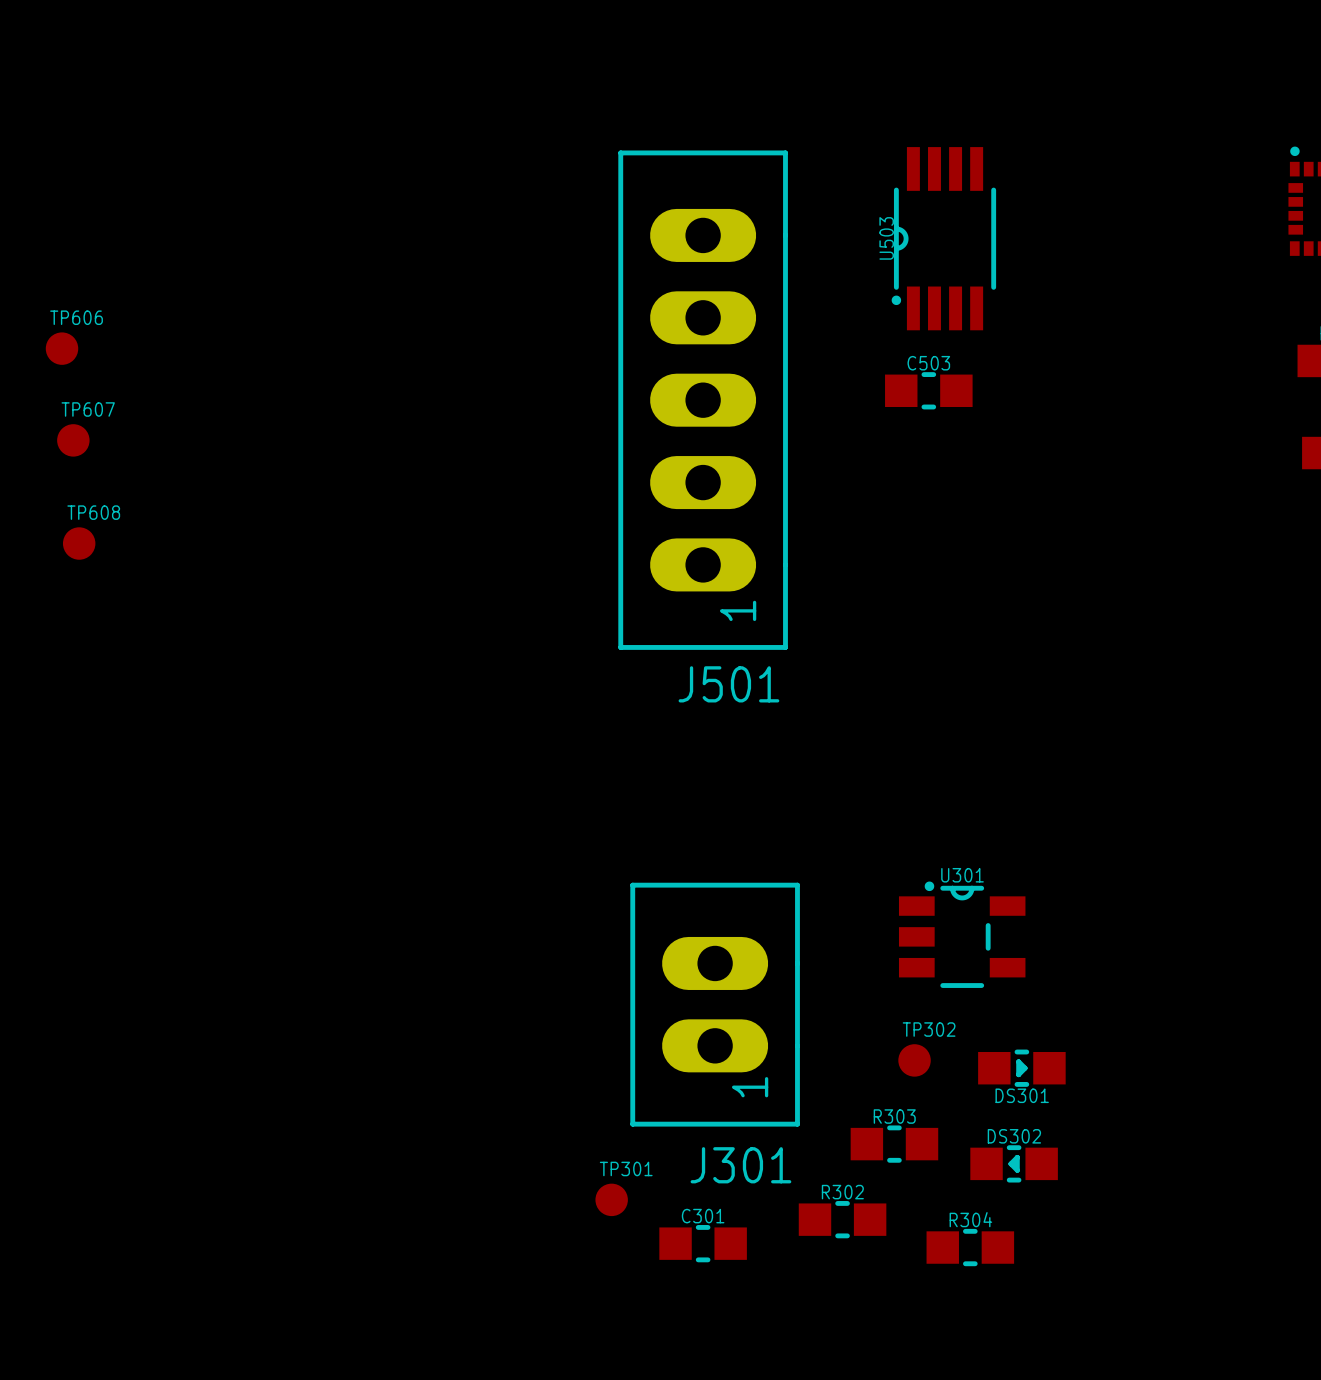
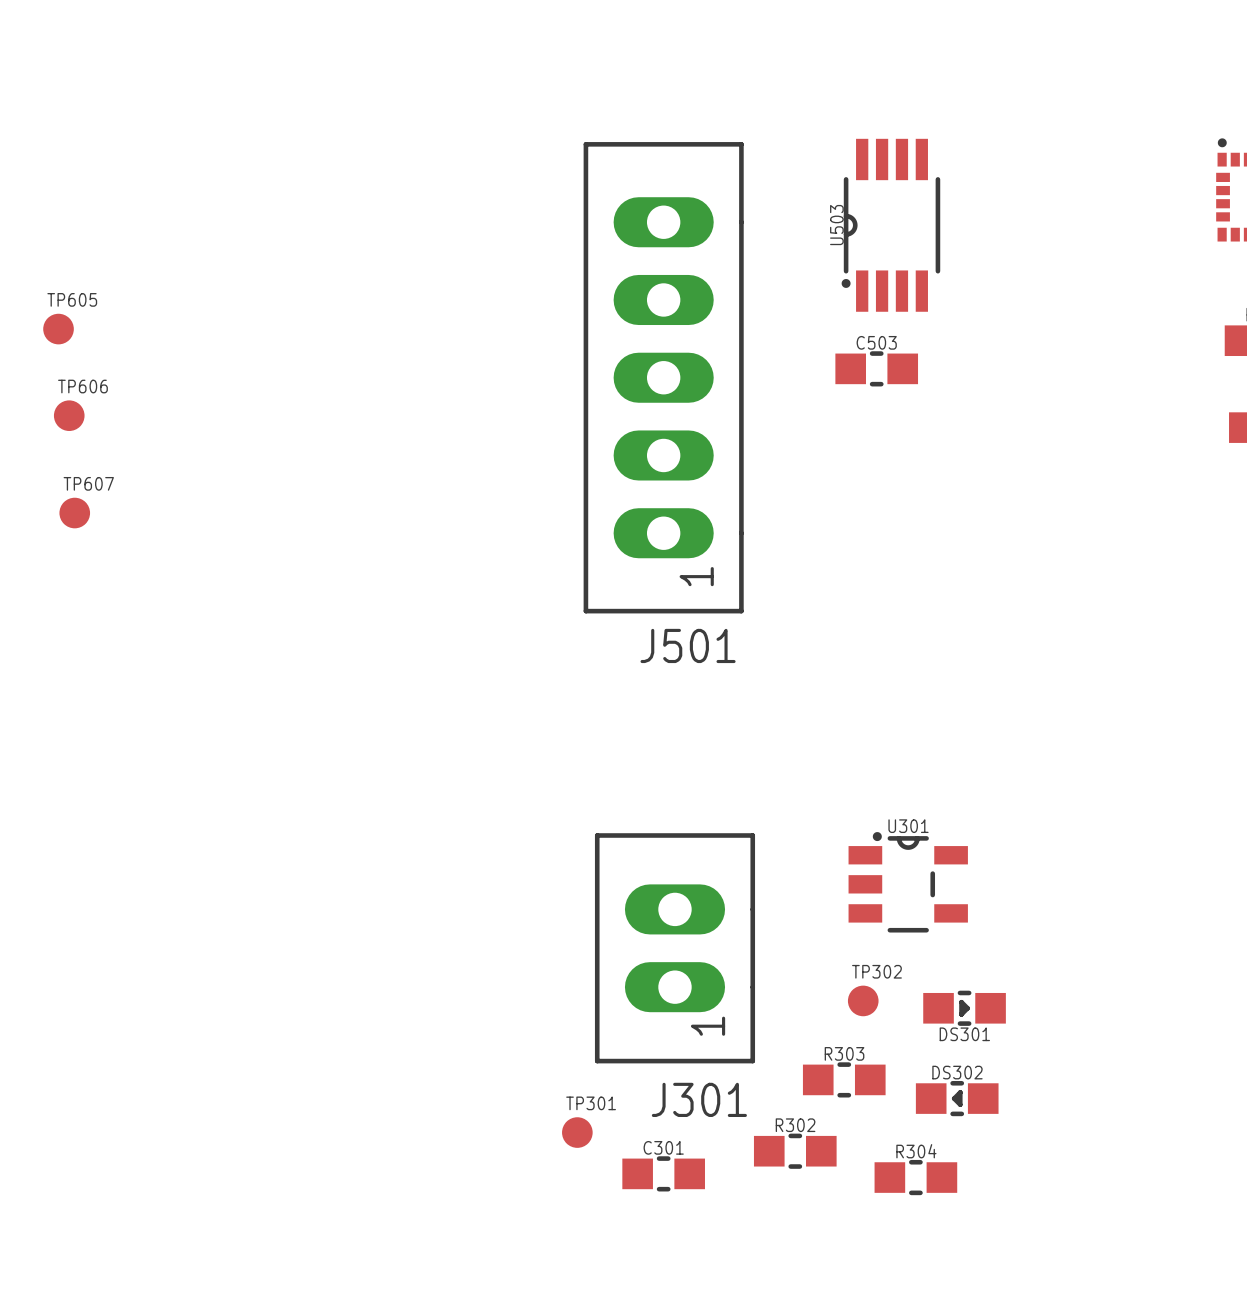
TP606 name: TP606 (76, 317) -> TP605 (72, 299)
TP607 name: TP607 (88, 409) -> TP606 (82, 386)
TP608 name: TP608 (93, 512) -> TP607 (88, 483)

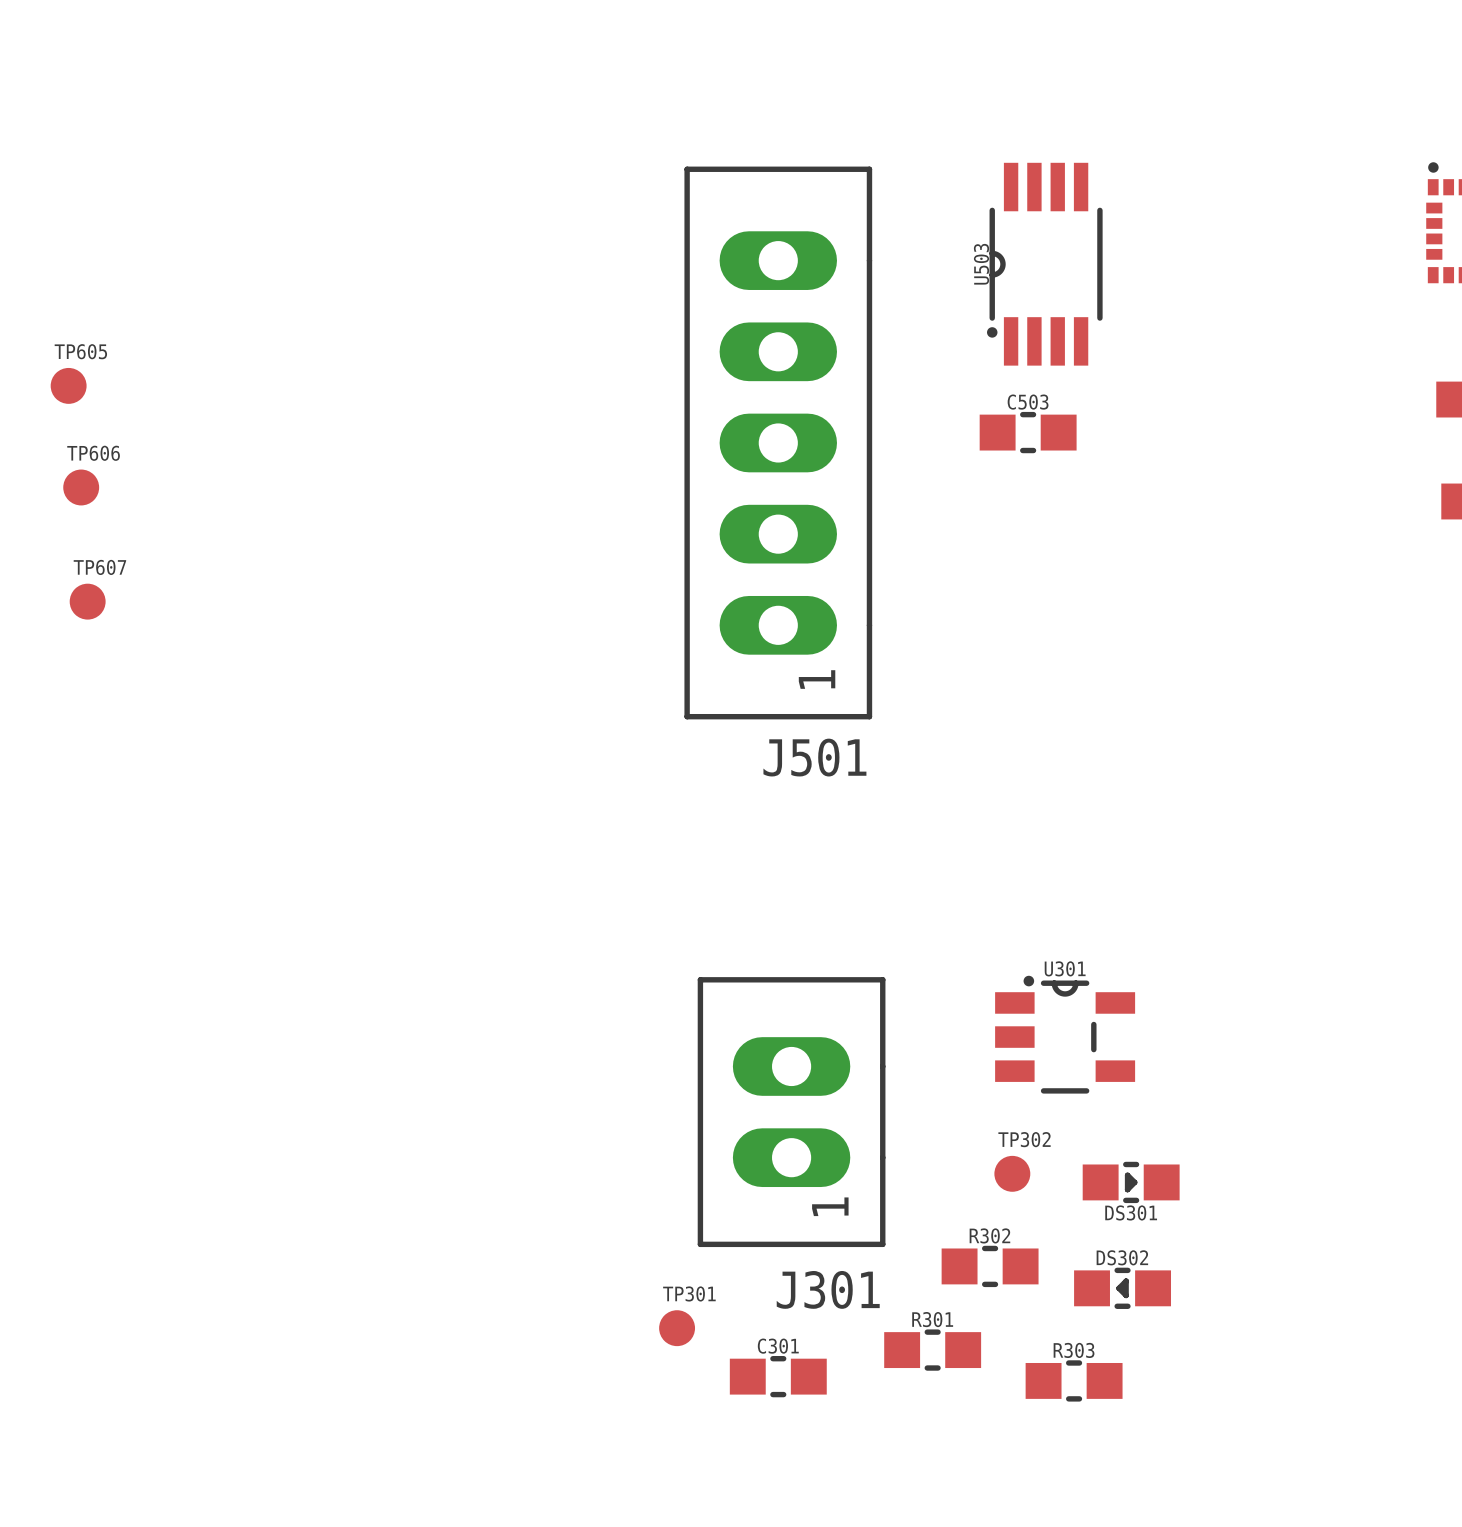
R303 name: R303 (844, 1053) -> R302 (989, 1235)
R302 name: R302 (795, 1125) -> R301 (932, 1319)
R304 name: R304 (916, 1151) -> R303 (1074, 1350)

